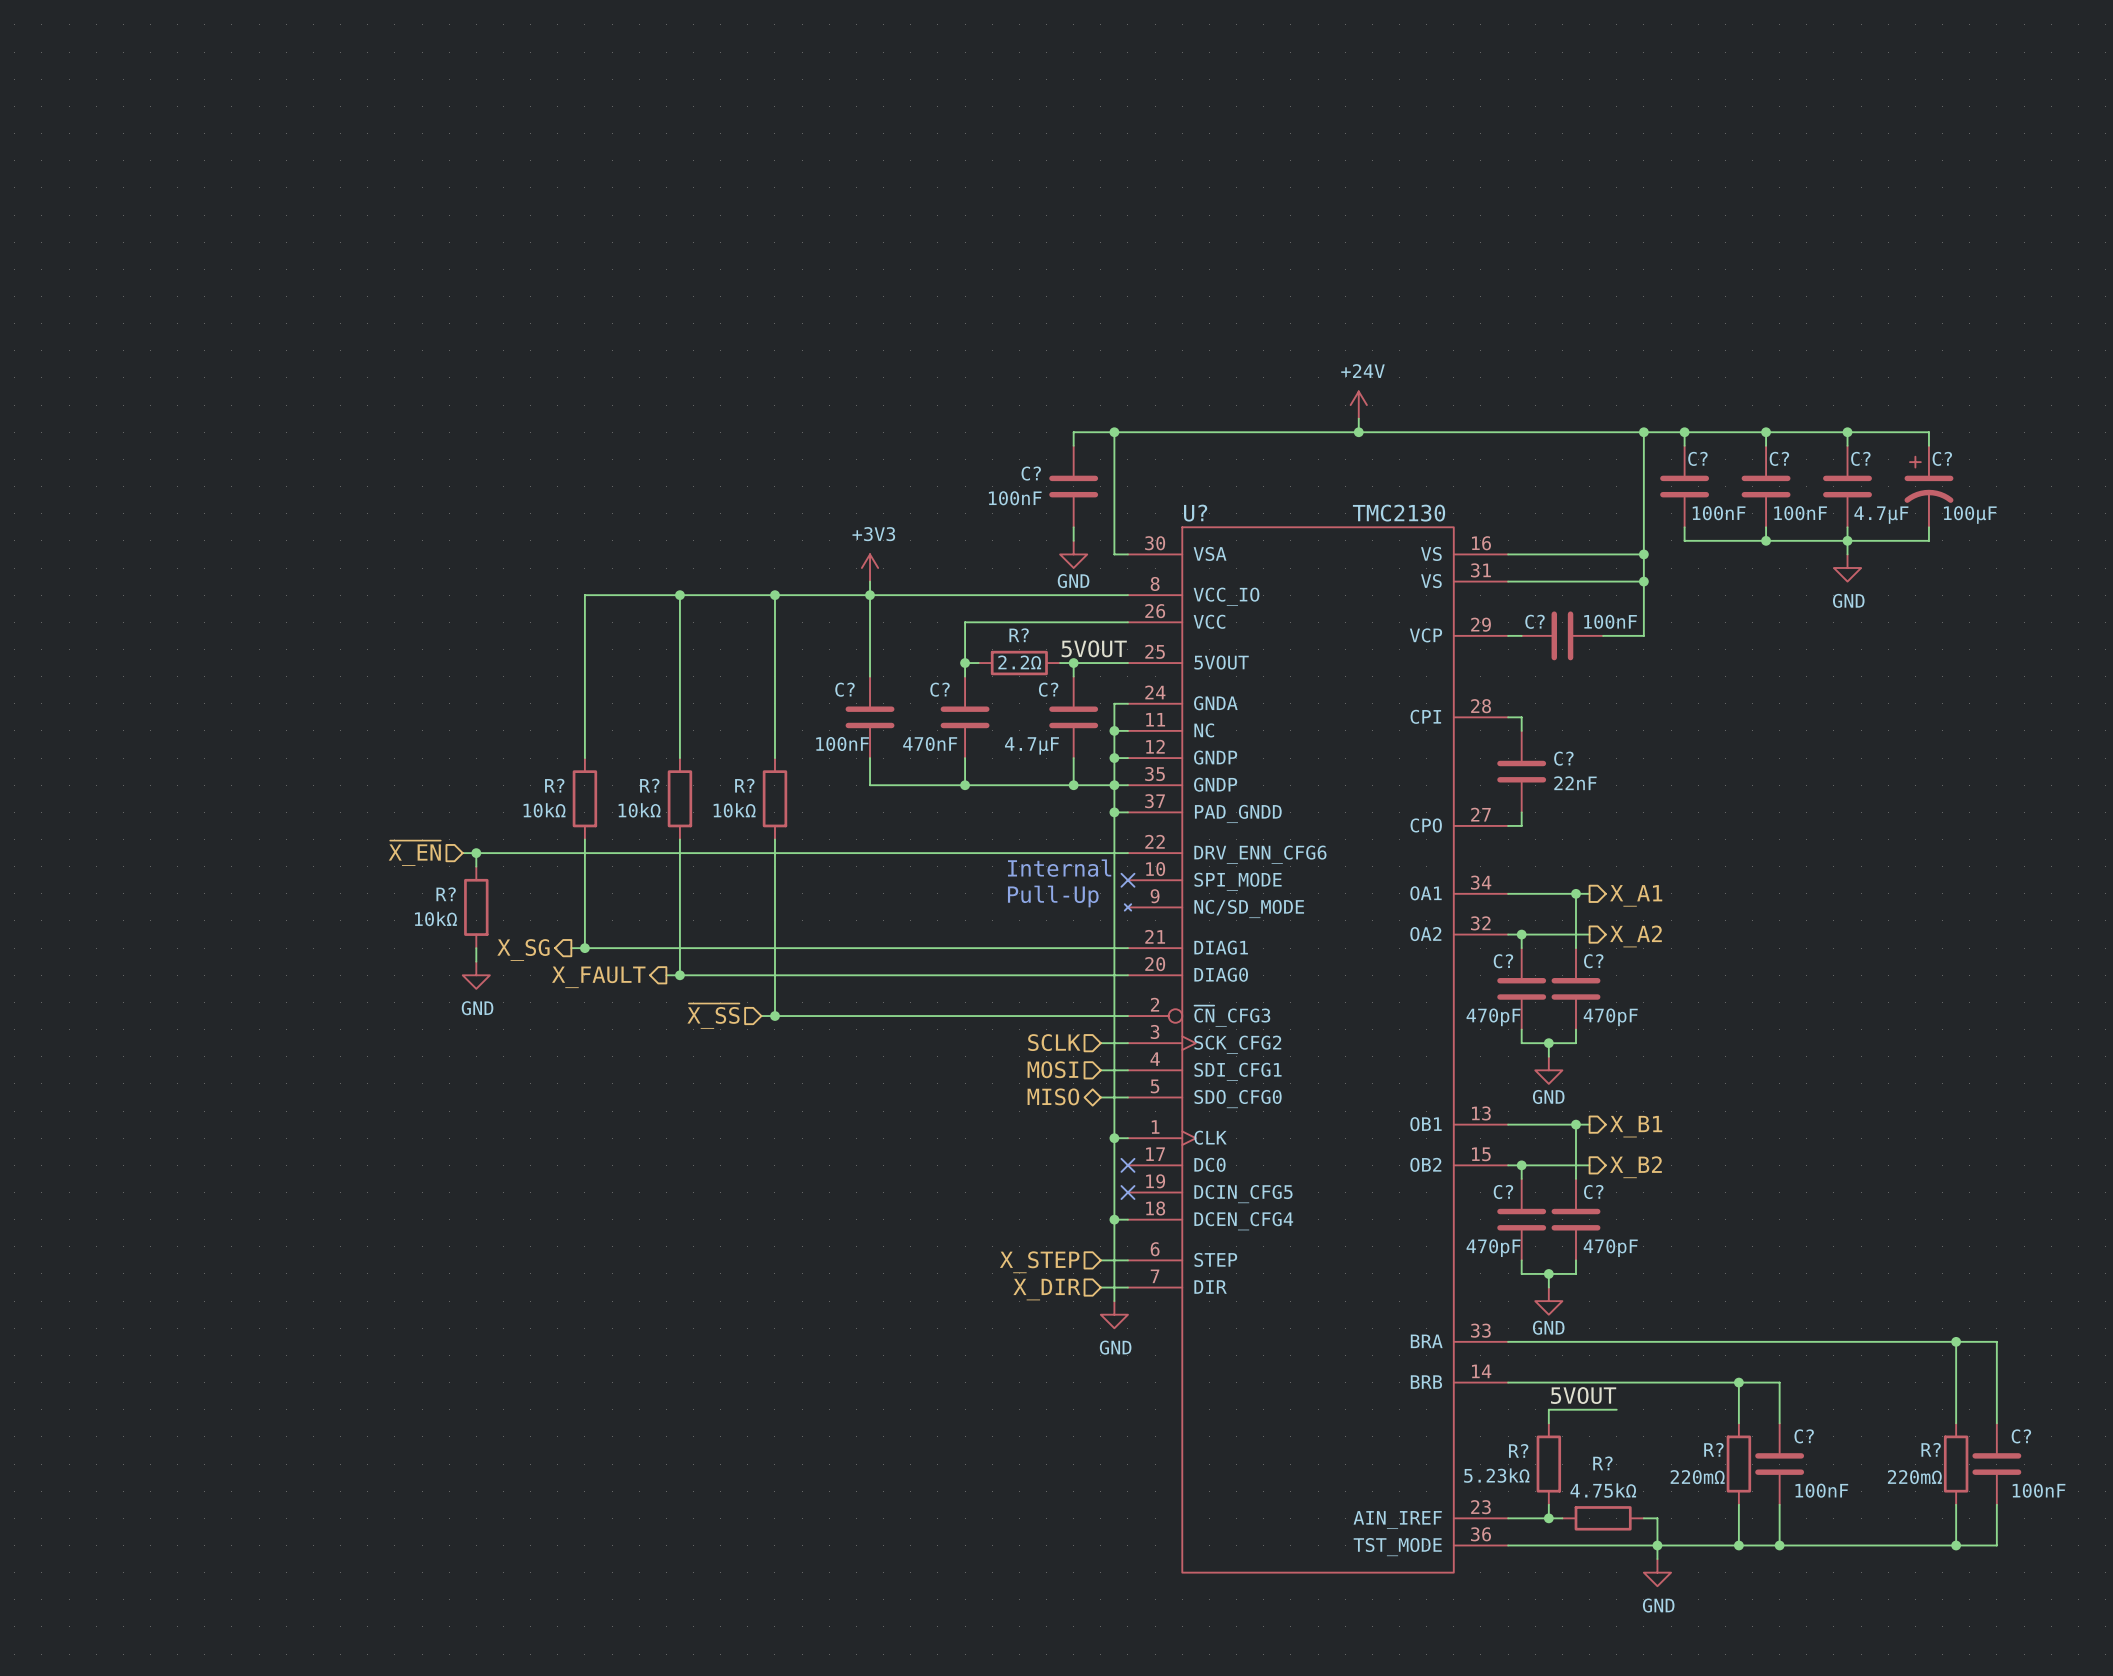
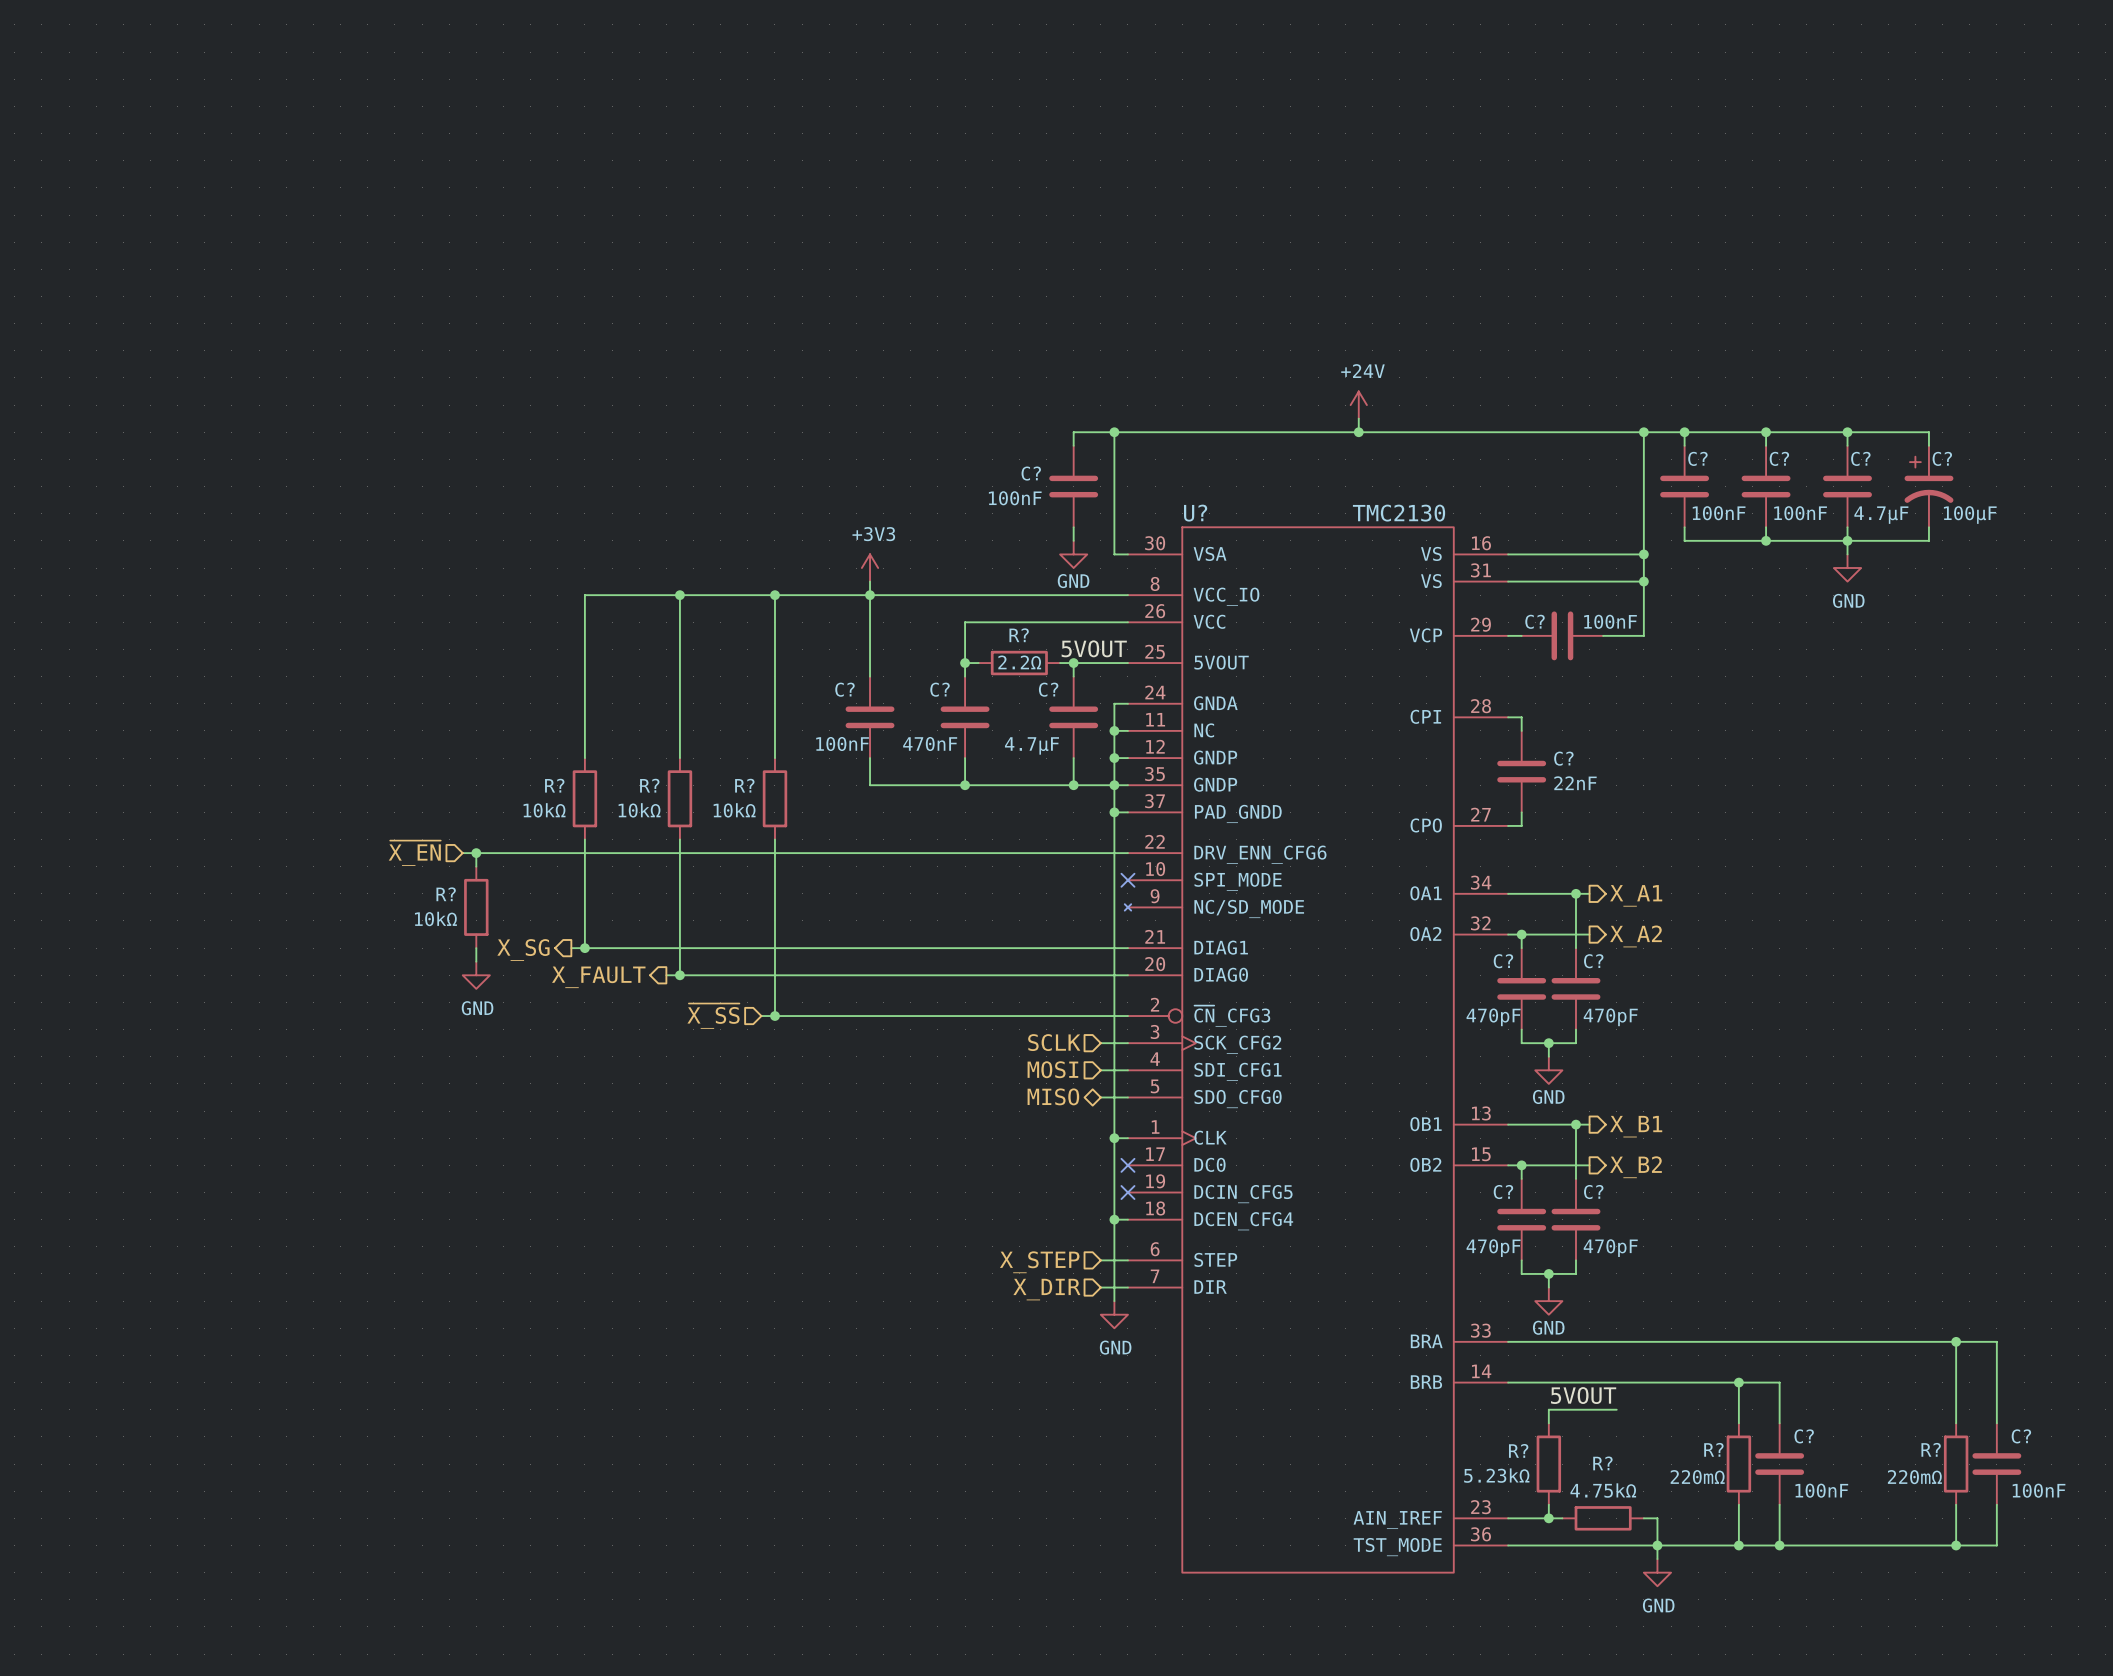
text: Internal (1059, 868) -> none
text: Pull-Up (1053, 896) -> none

